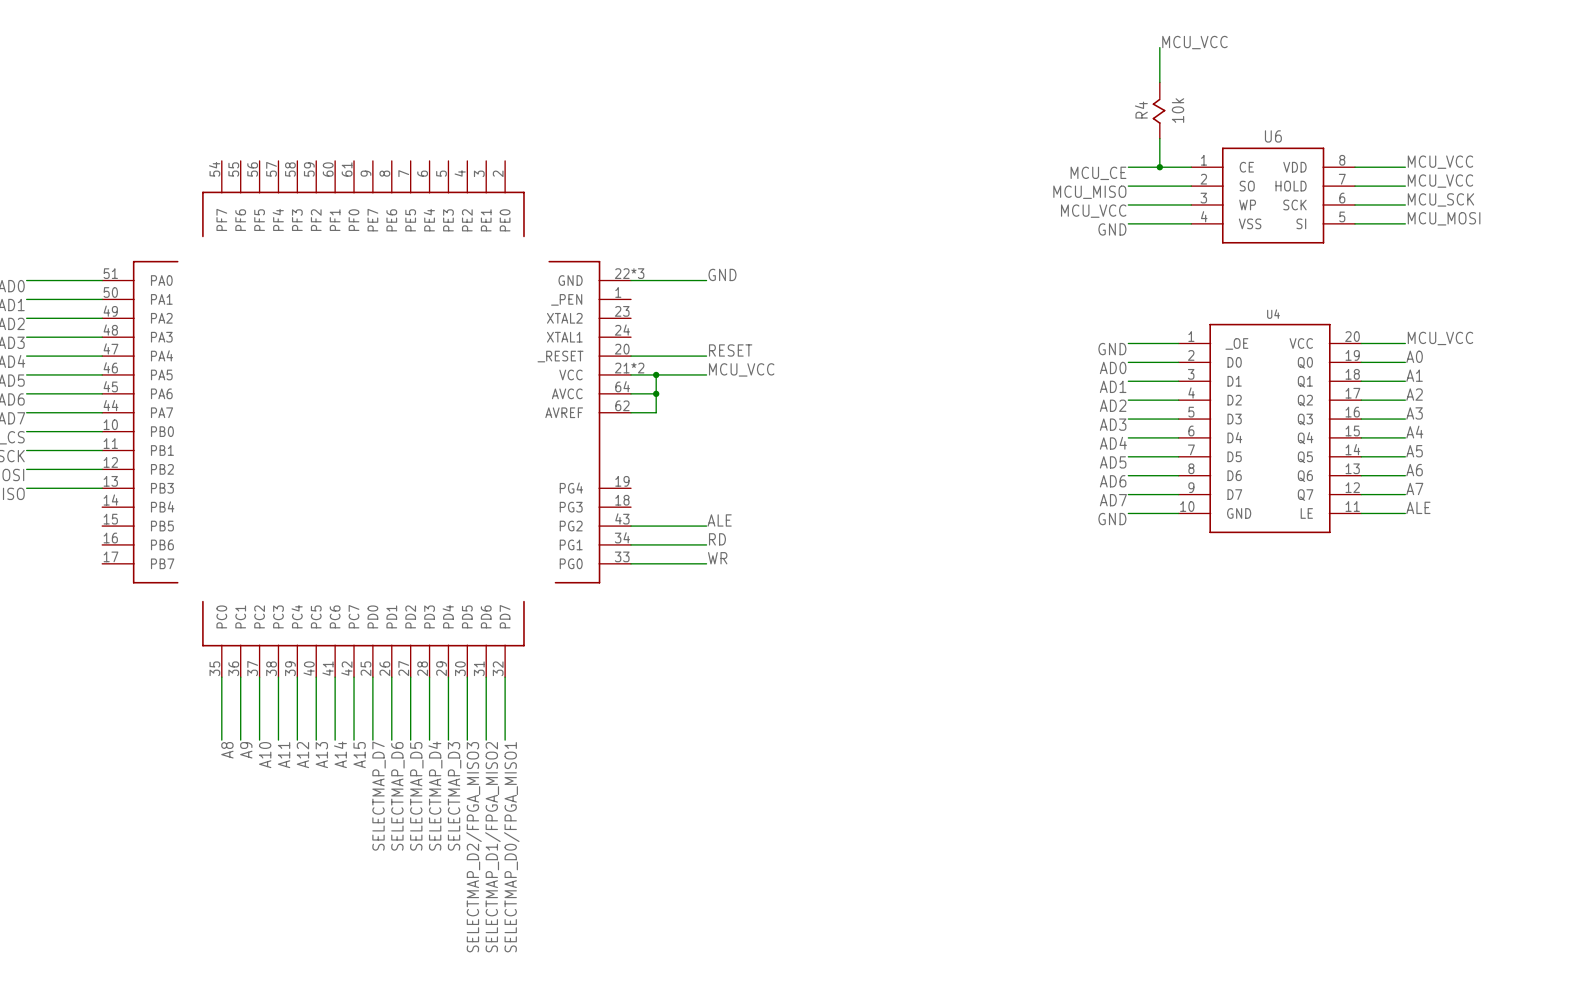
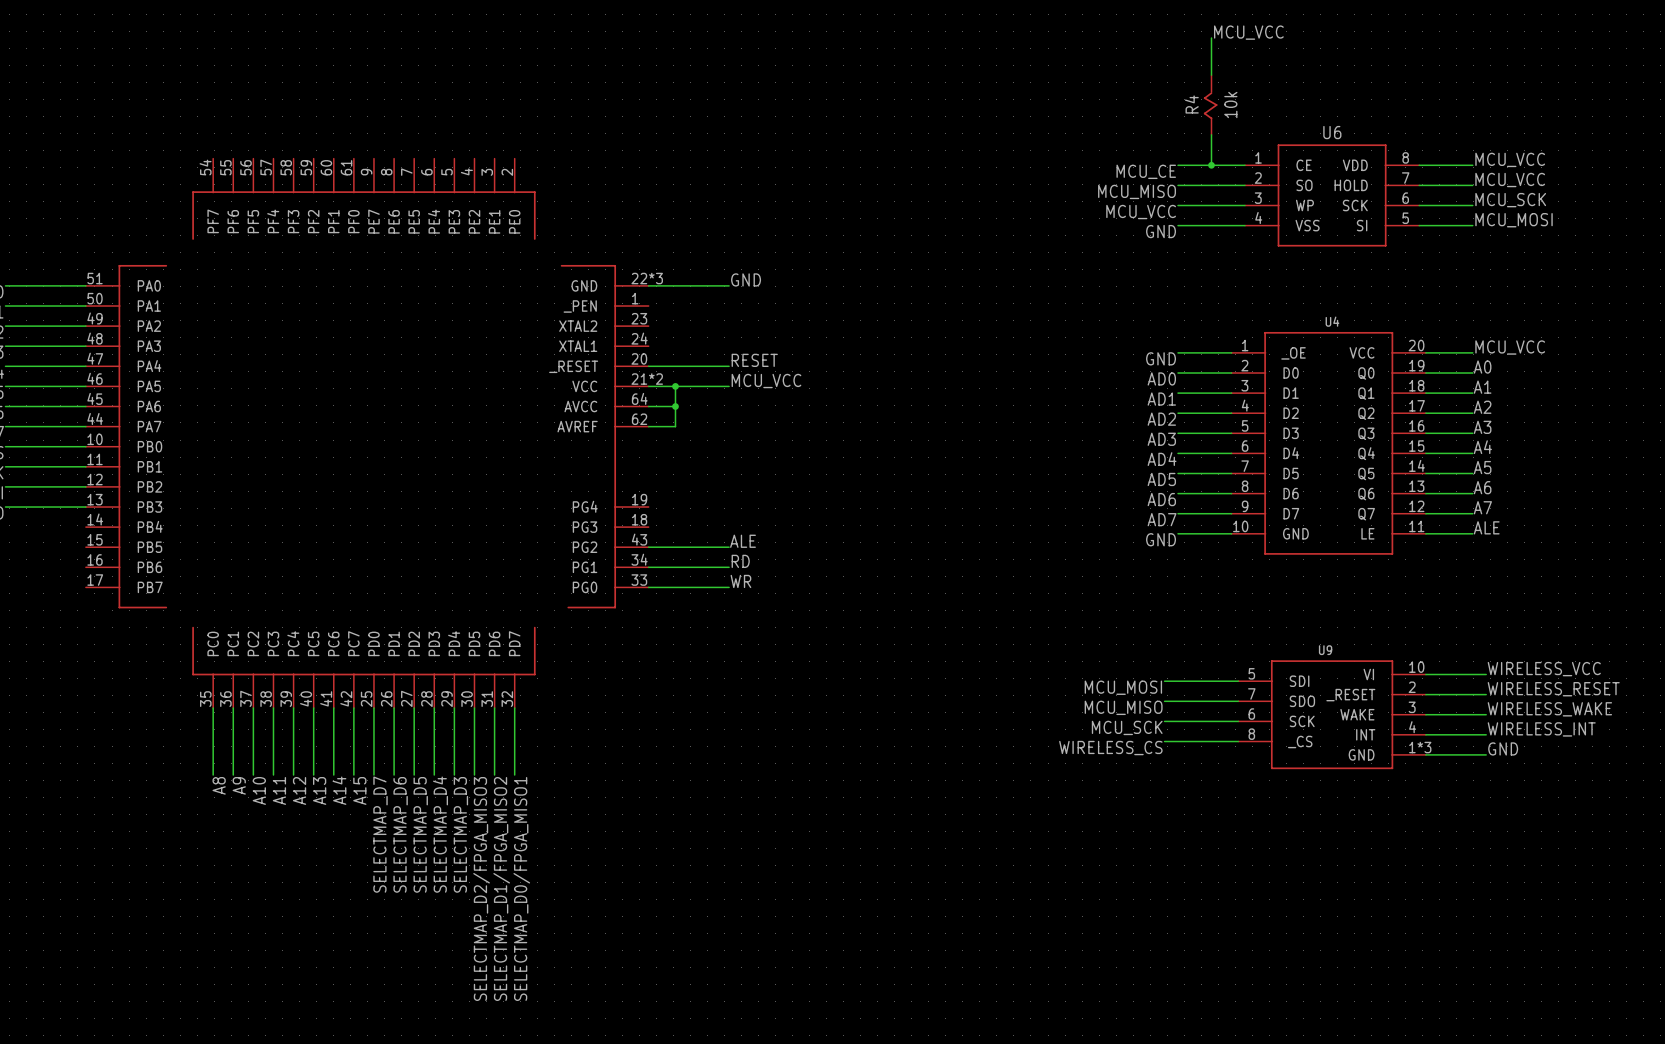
label: none -> WIRELESS_VCC (1544, 669)
wire: none -> (1425, 674) (1486, 674)
wire: none -> (1164, 681) (1238, 681)
label: none -> MCU_MOSI (1123, 687)
label: none -> WIRELESS_RESET (1553, 689)
wire: none -> (1425, 694) (1486, 694)
wire: none -> (1164, 701) (1238, 701)
label: none -> MCU_MISO (1123, 707)
label: none -> WIRELESS_WAKE (1549, 709)
U9: none -> (1332, 714)
wire: none -> (1425, 714) (1486, 714)
wire: none -> (1164, 721) (1238, 721)
label: none -> MCU_SCK (1127, 727)
label: none -> WIRELESS_INT (1541, 729)
wire: none -> (1425, 734) (1486, 734)
wire: none -> (1164, 741) (1238, 741)
label: none -> WIRELESS_CS (1110, 748)
label: none -> GND (1503, 748)
wire: none -> (1425, 754) (1486, 754)

